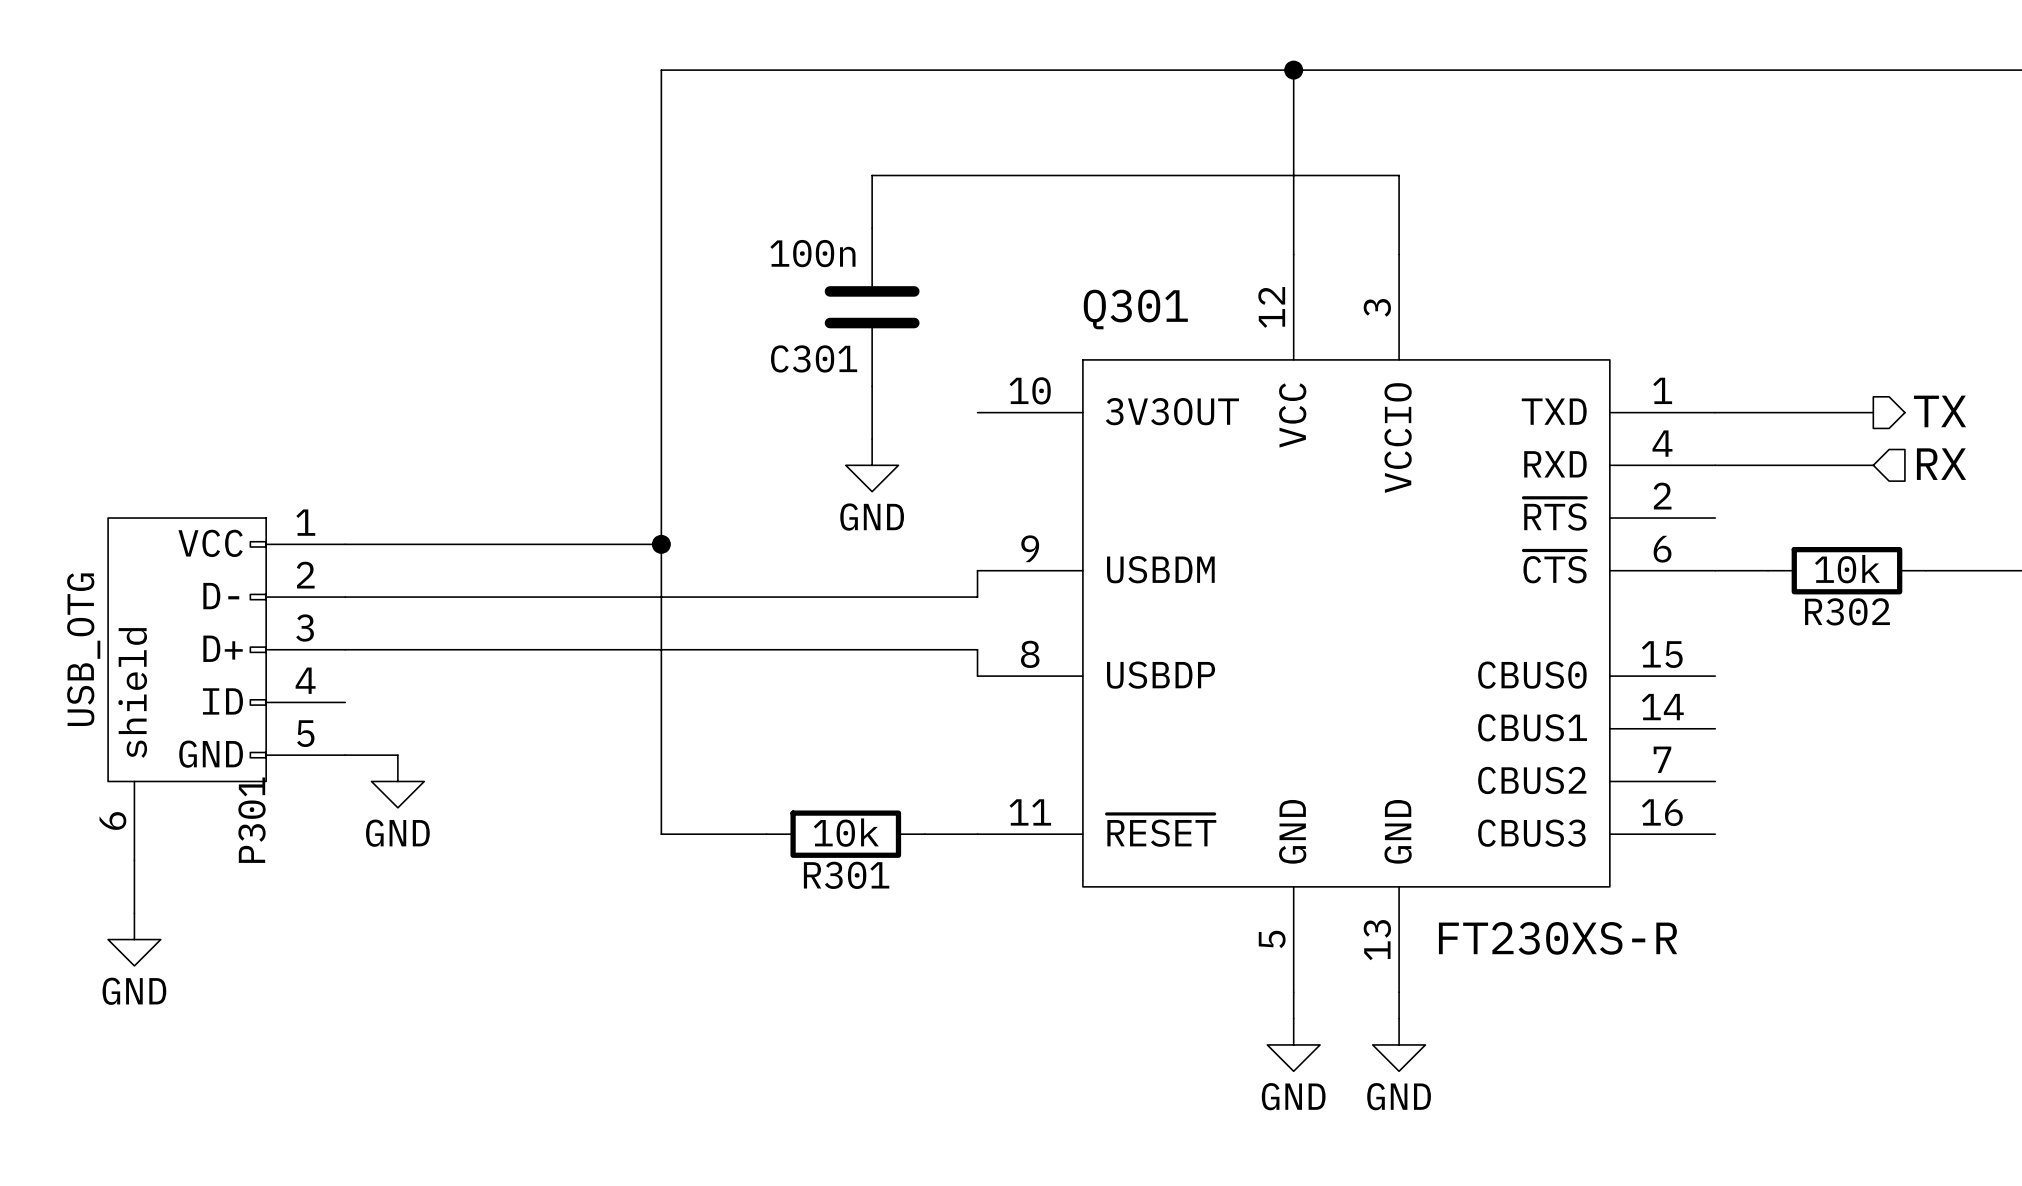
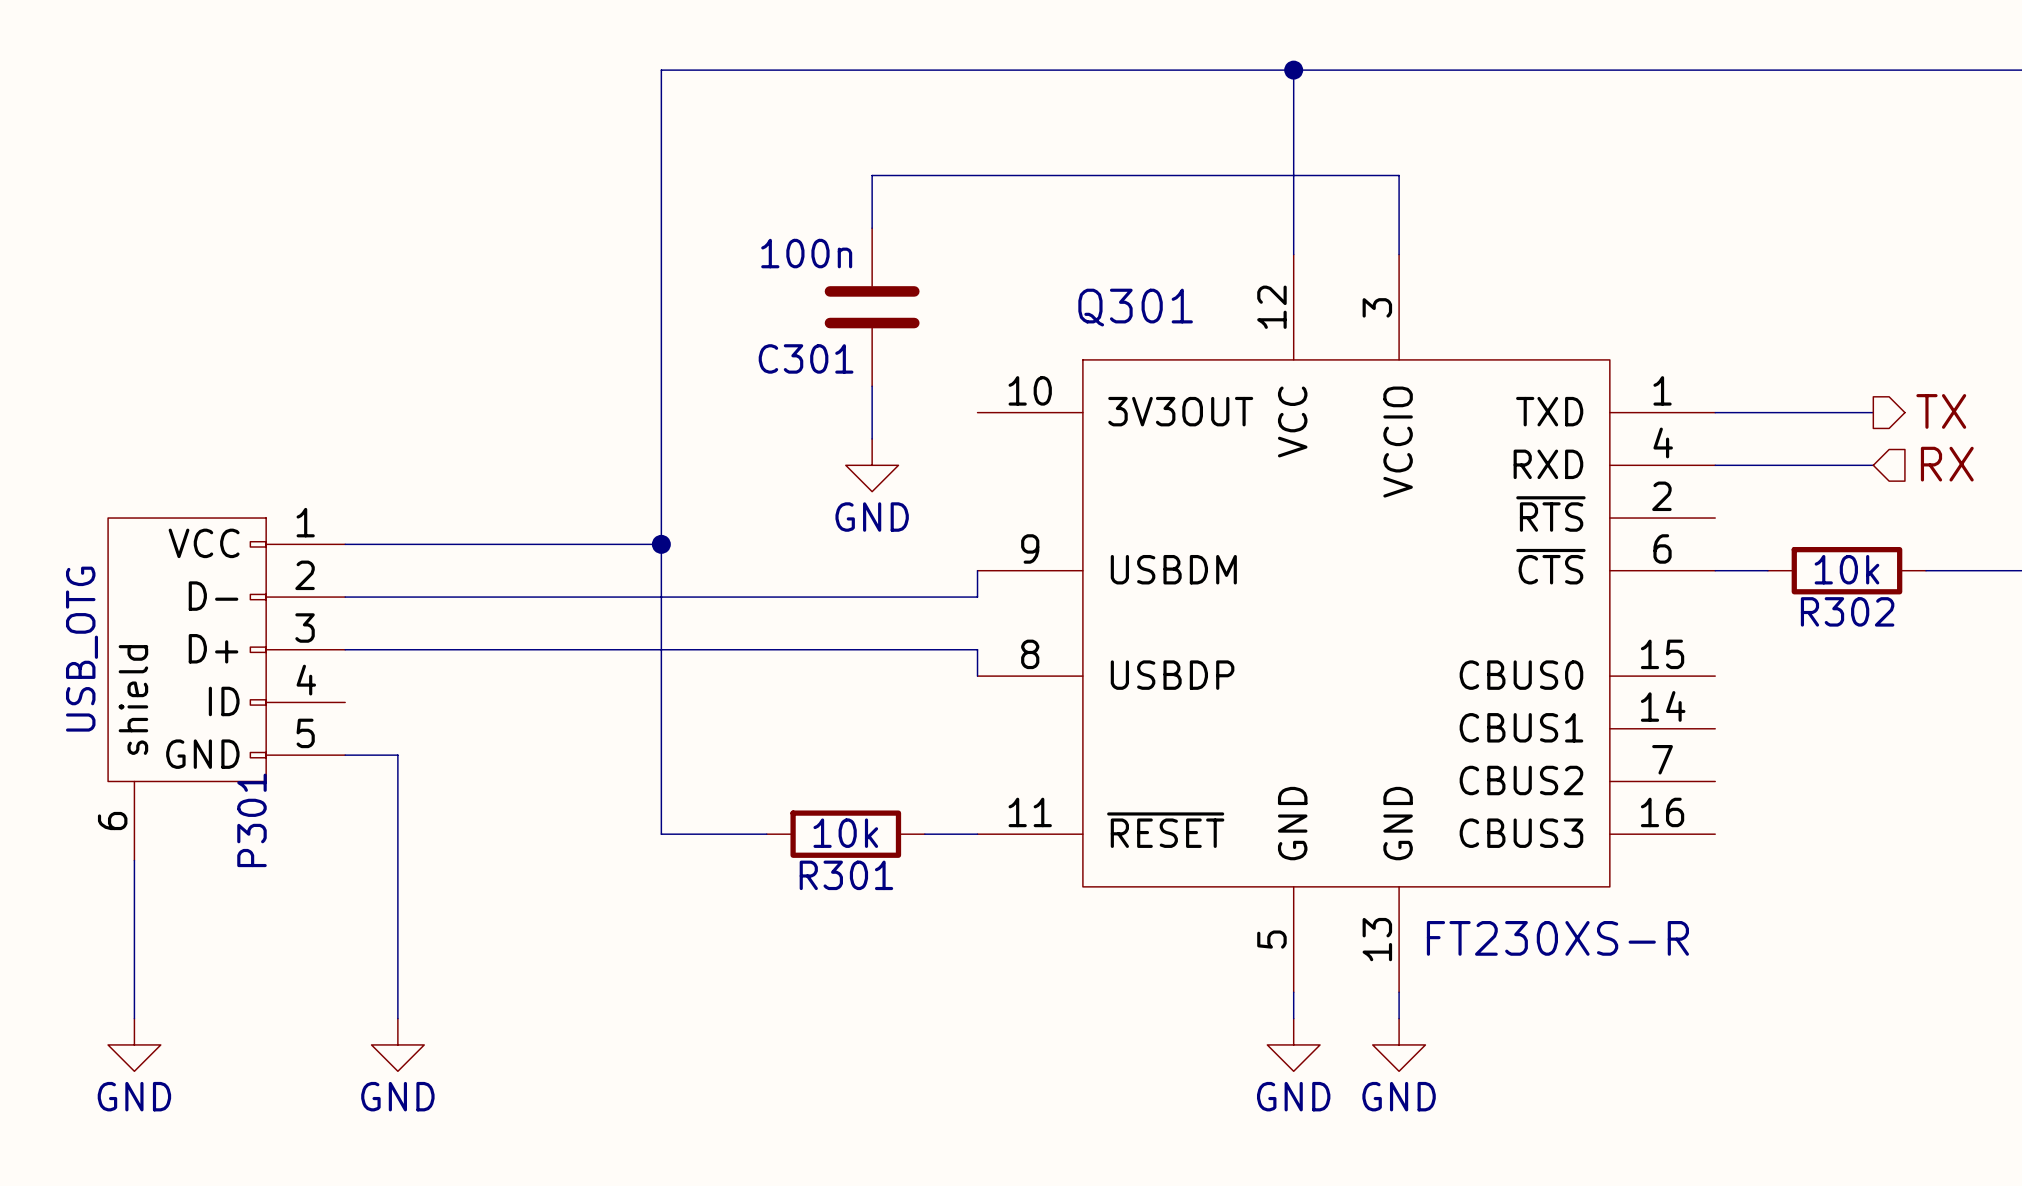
wire: none -> (397, 755) (397, 1018)
power symbol: GND (397, 781) -> none
wire: none -> (134, 913) (134, 1018)
power symbol position: GND (134, 939) -> GND (134, 1044)
power symbol: none -> GND (397, 1044)

